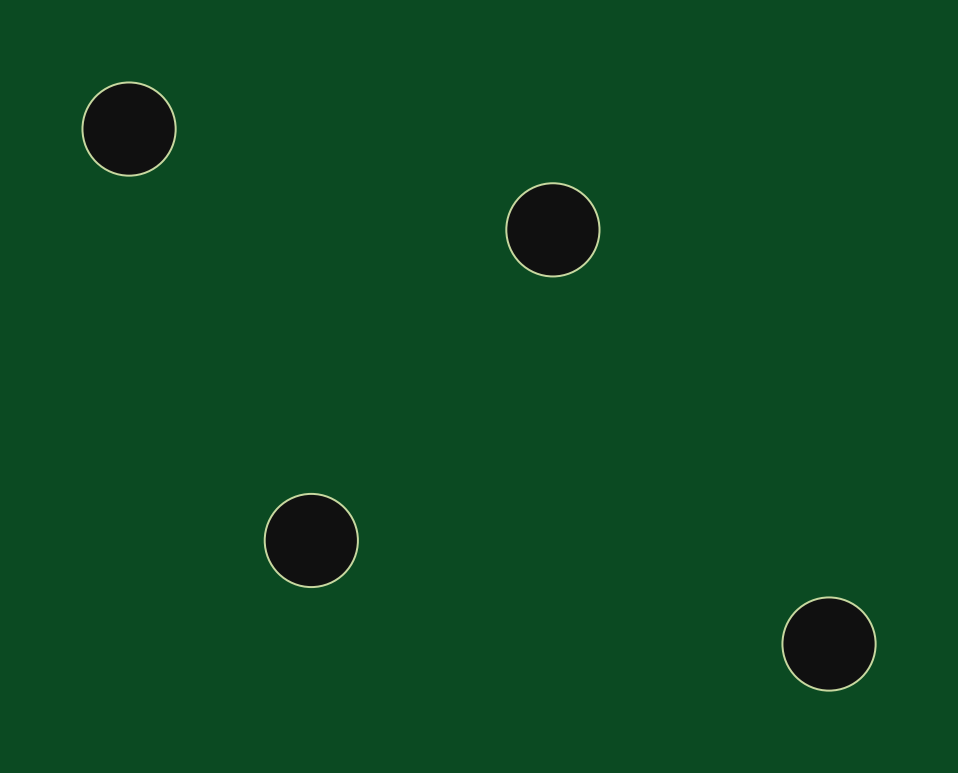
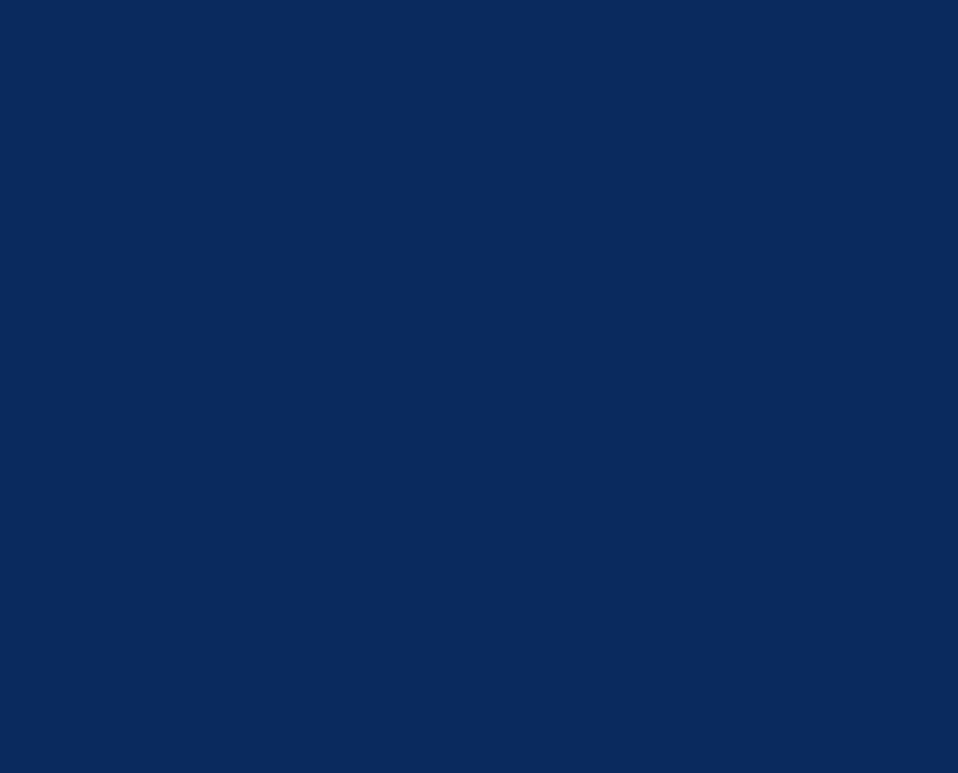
part: (129, 129) -> none
part: (552, 229) -> none
part: (311, 540) -> none
part: (829, 644) -> none

